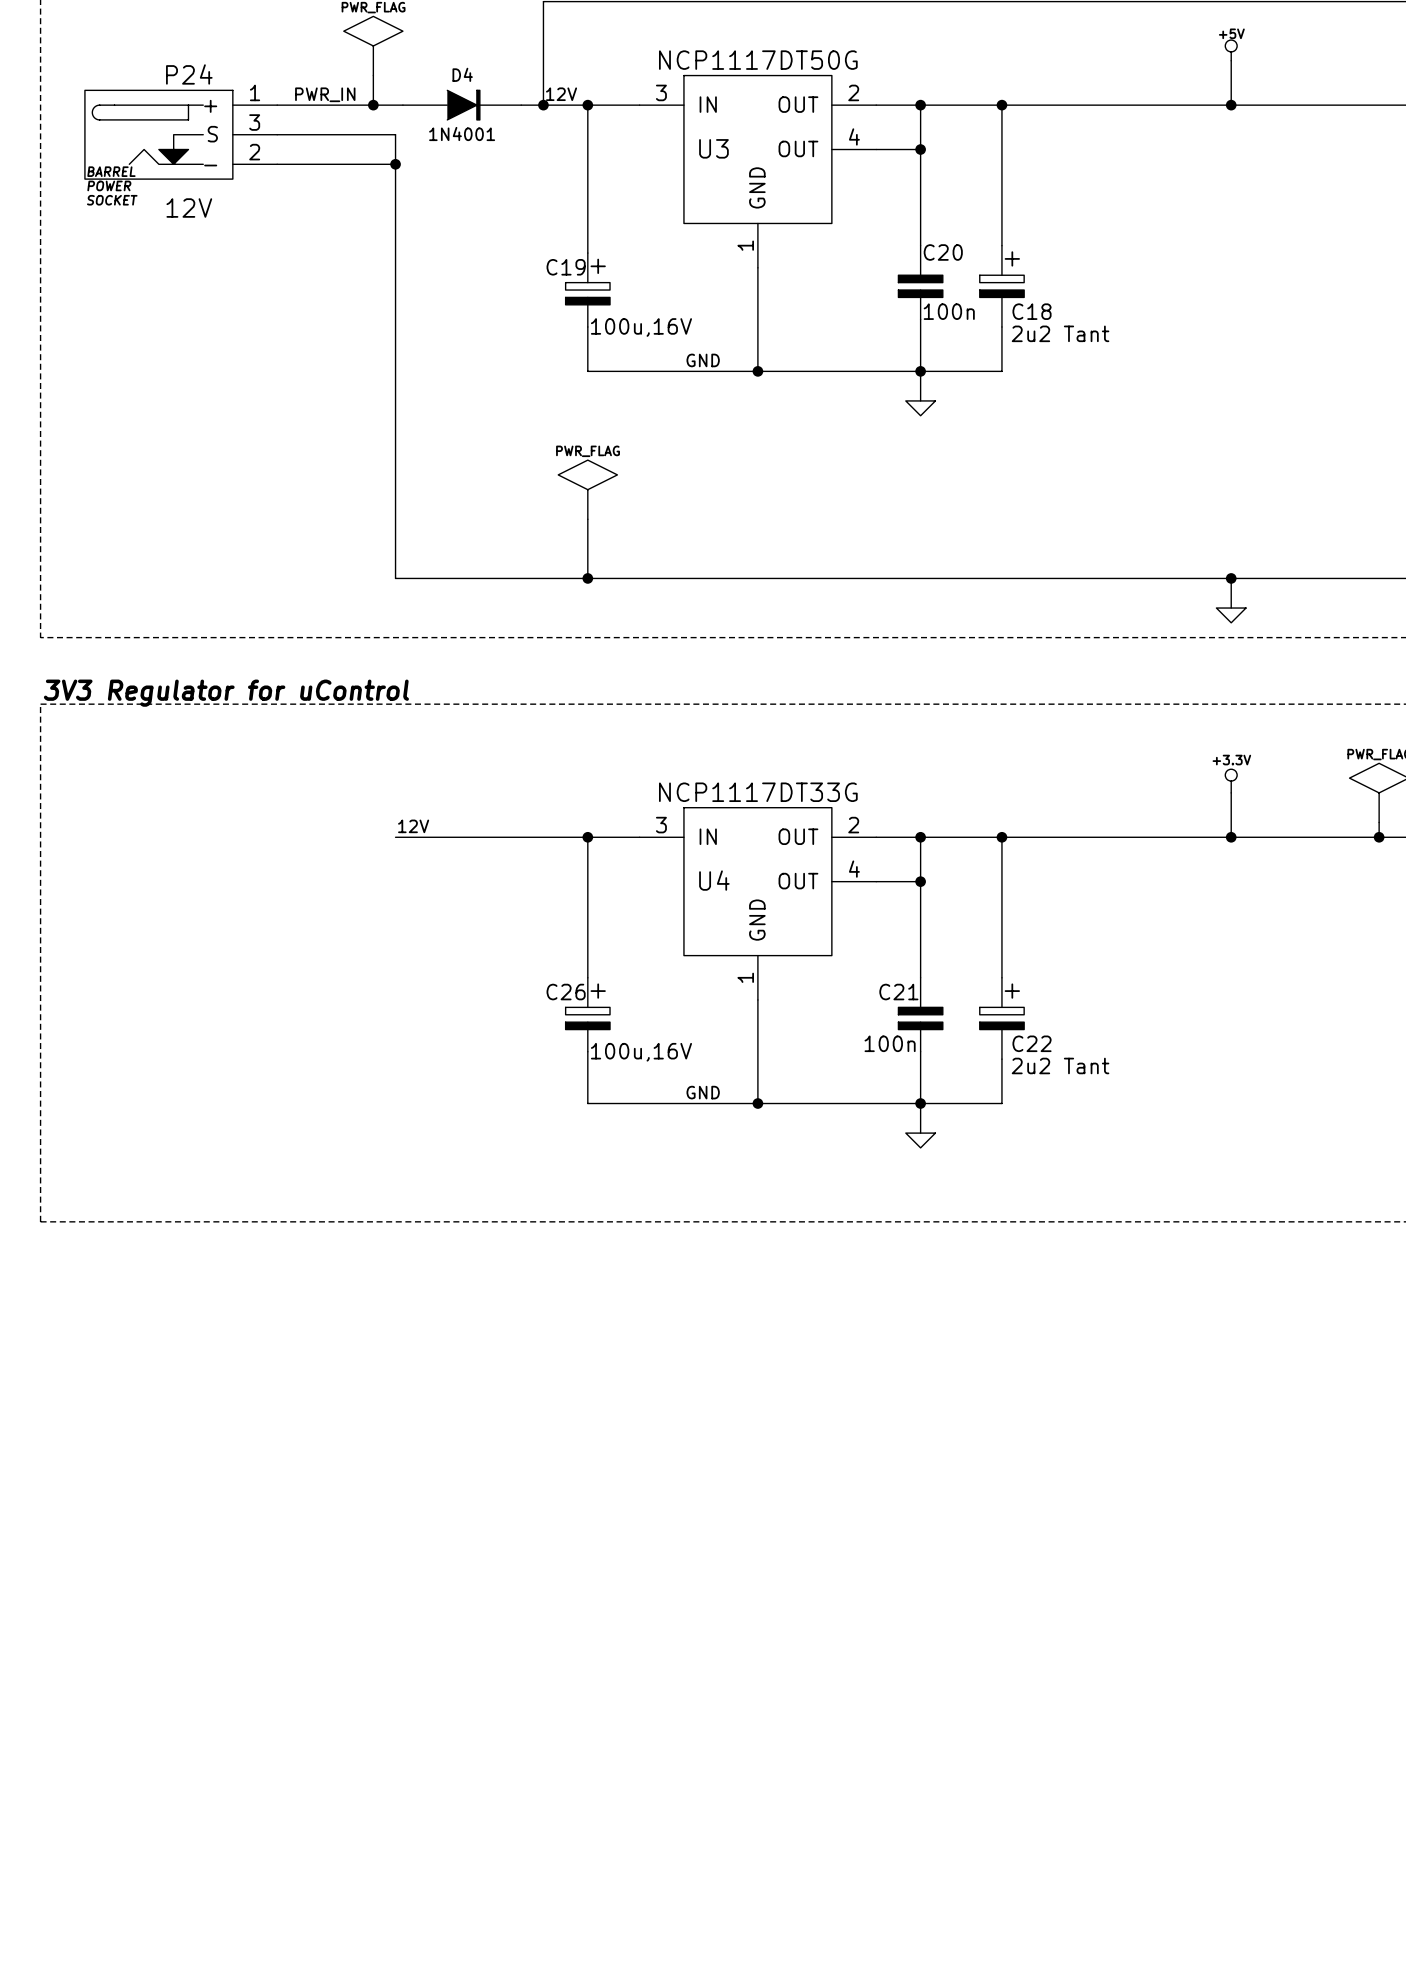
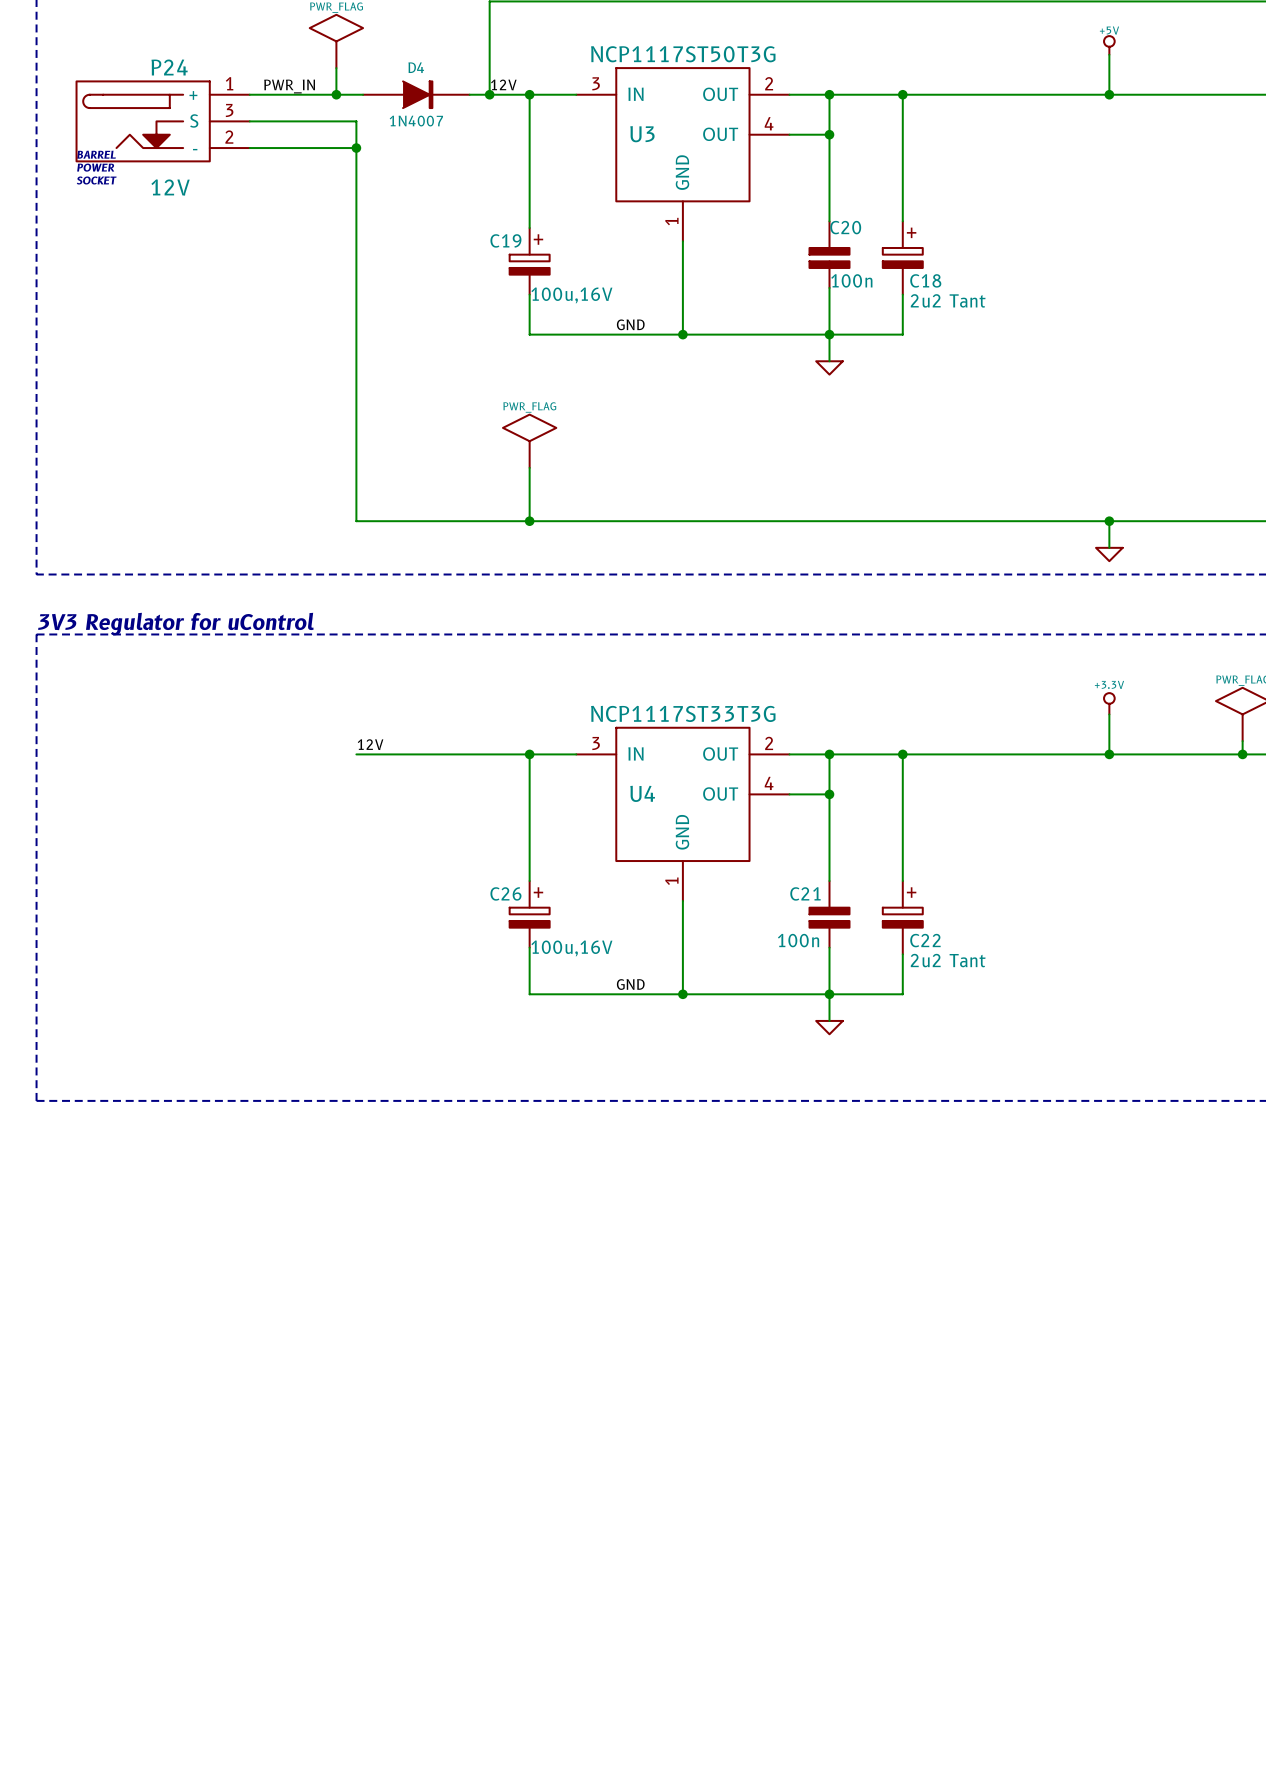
U3 value: NCP1117DT50G (758, 60) -> NCP1117ST50T3G (683, 54)
D4 value: 1N4001 (462, 133) -> 1N4007 (416, 121)
U4 value: NCP1117DT33G (758, 792) -> NCP1117ST33T3G (683, 713)

